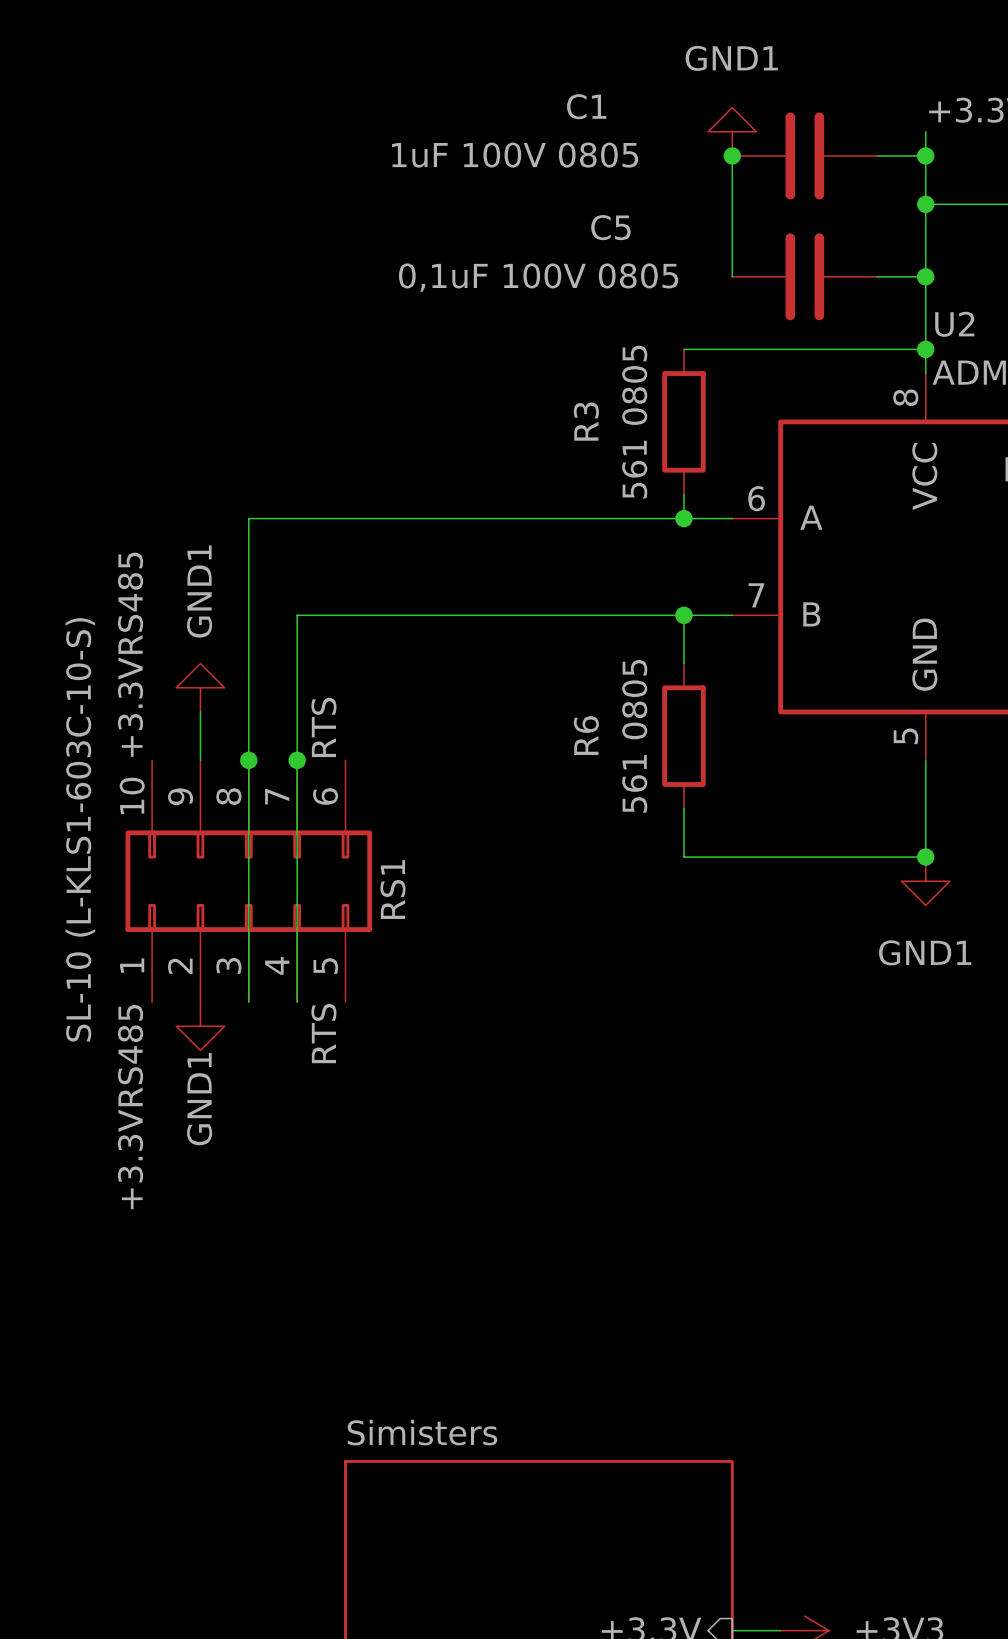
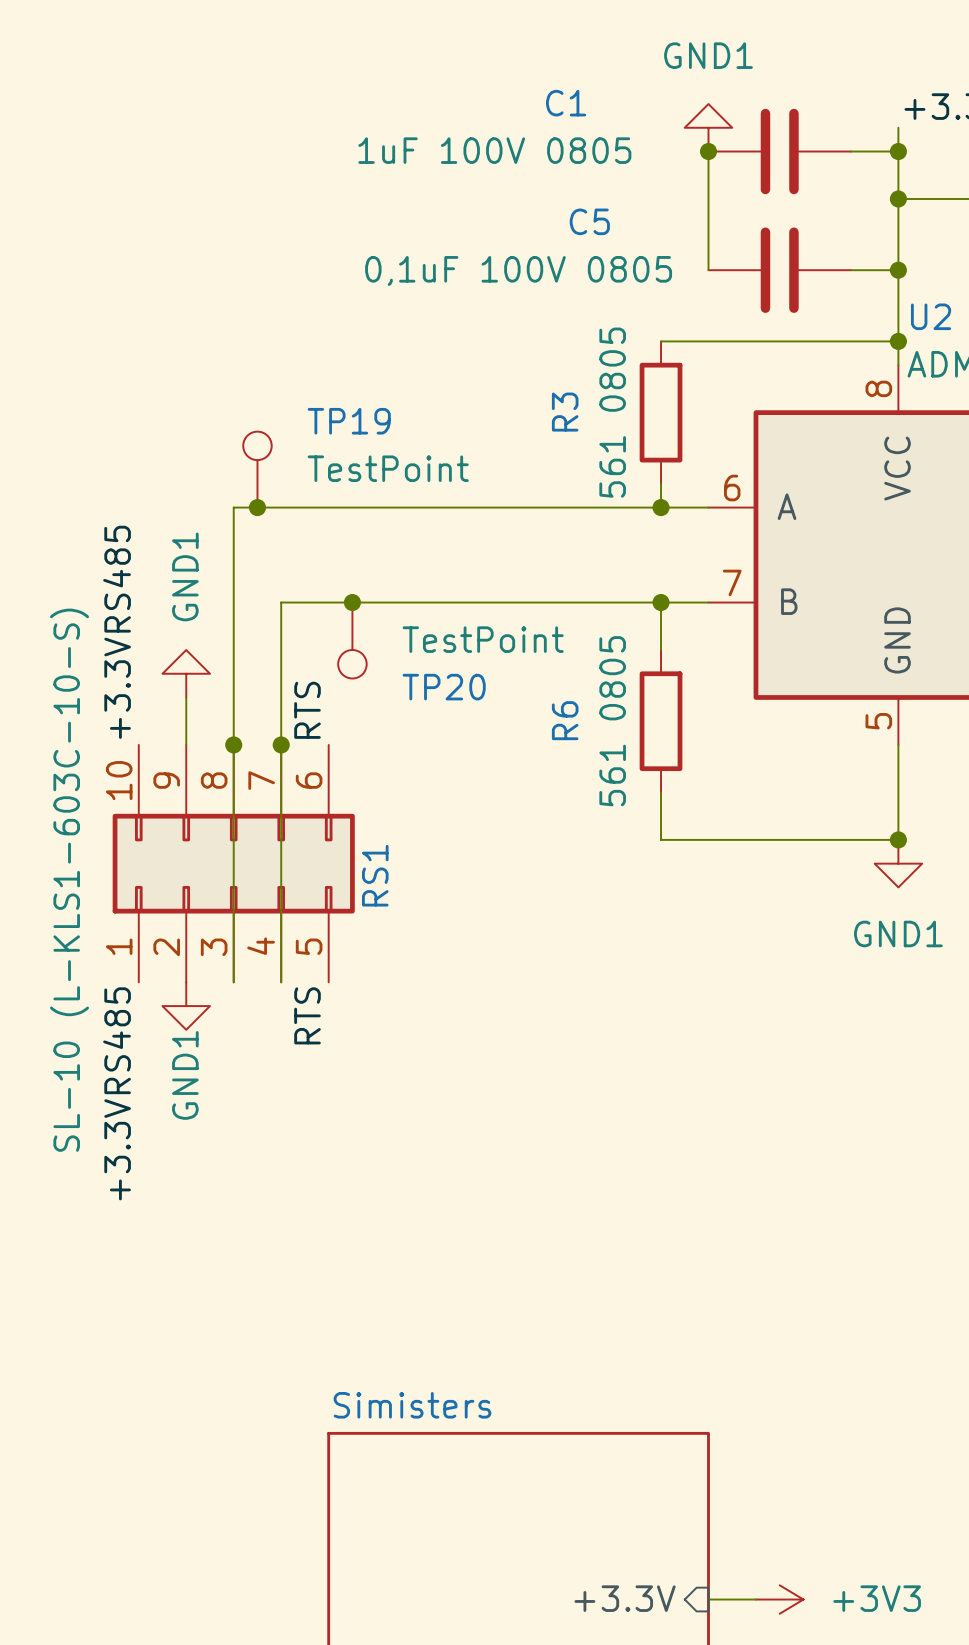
TP19: none -> TestPoint (257, 469)
junction: none -> (257, 507)
junction: none -> (352, 602)
TP20: none -> TestPoint (352, 640)

